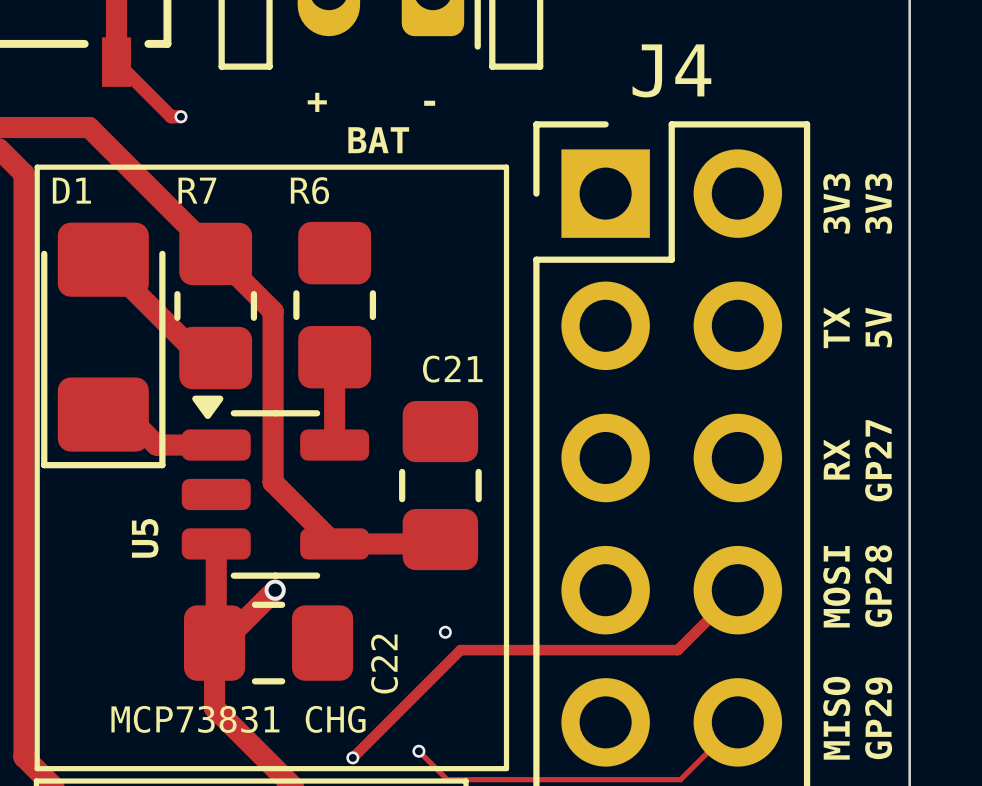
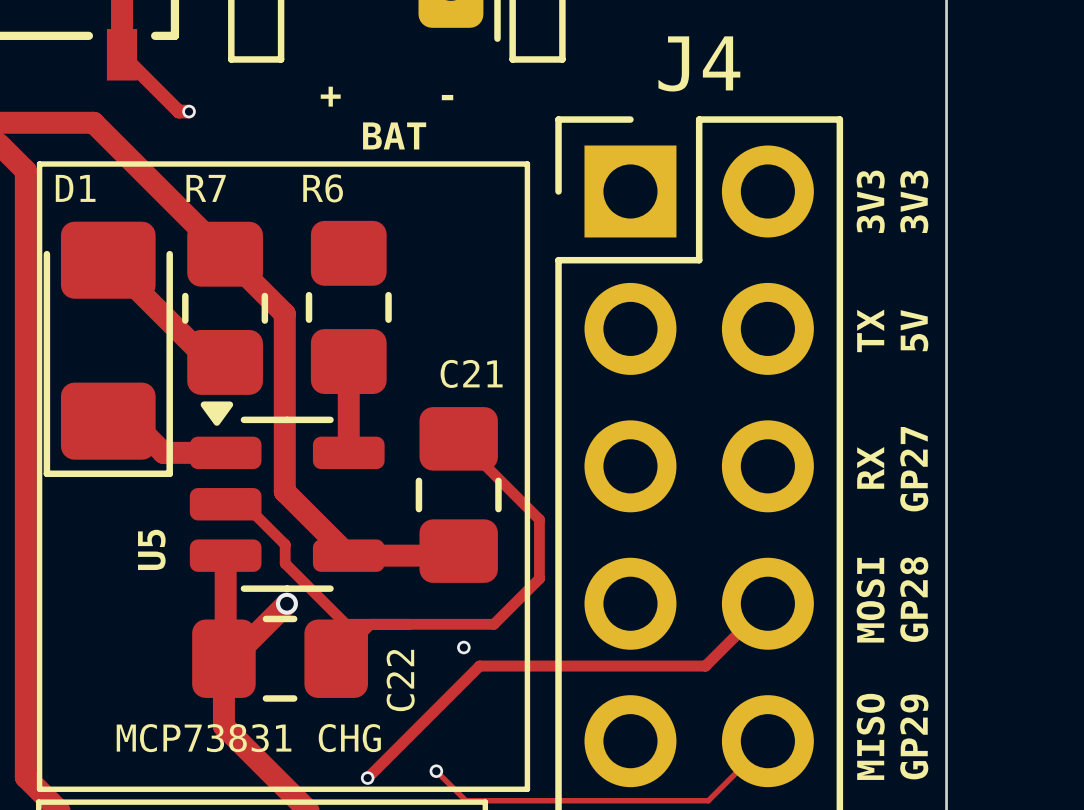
track: none -> (458, 438) (539, 519) (539, 578) (493, 624) (345, 624) (285, 563) (285, 544) (244, 504) (225, 504)

